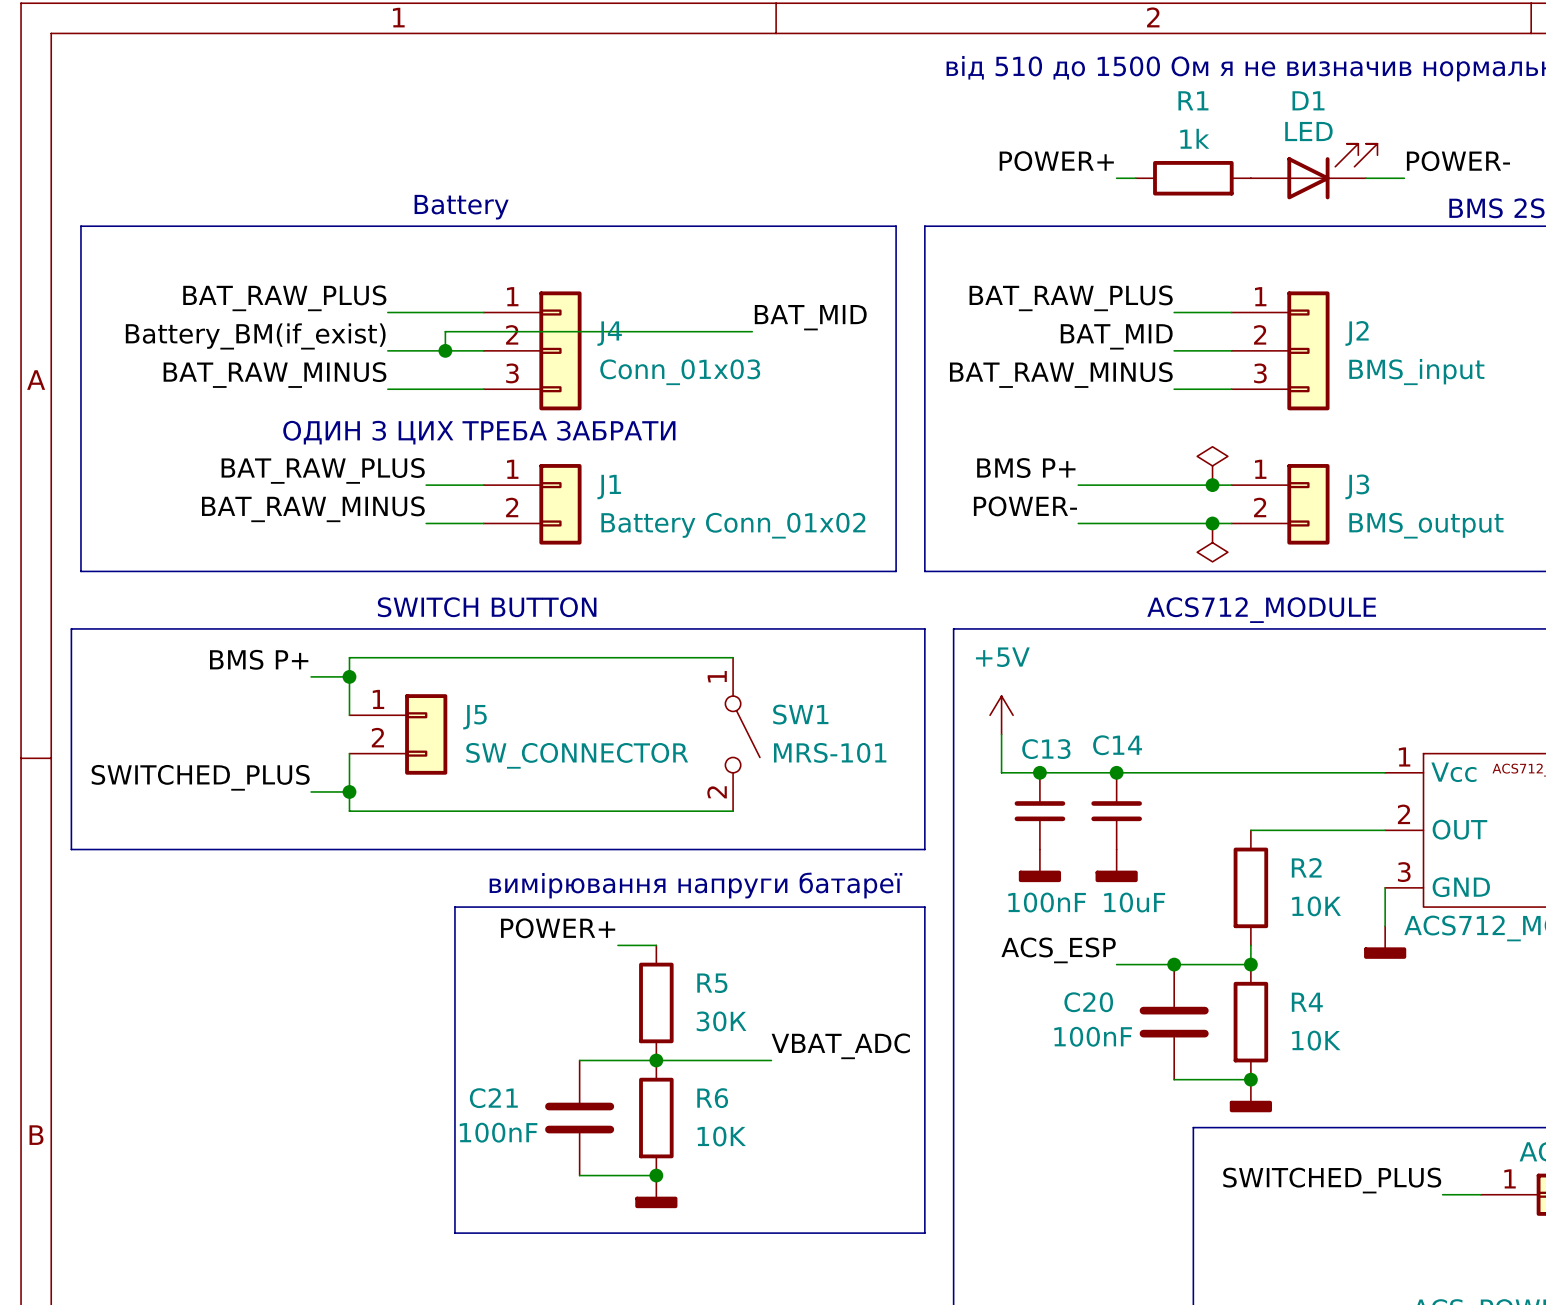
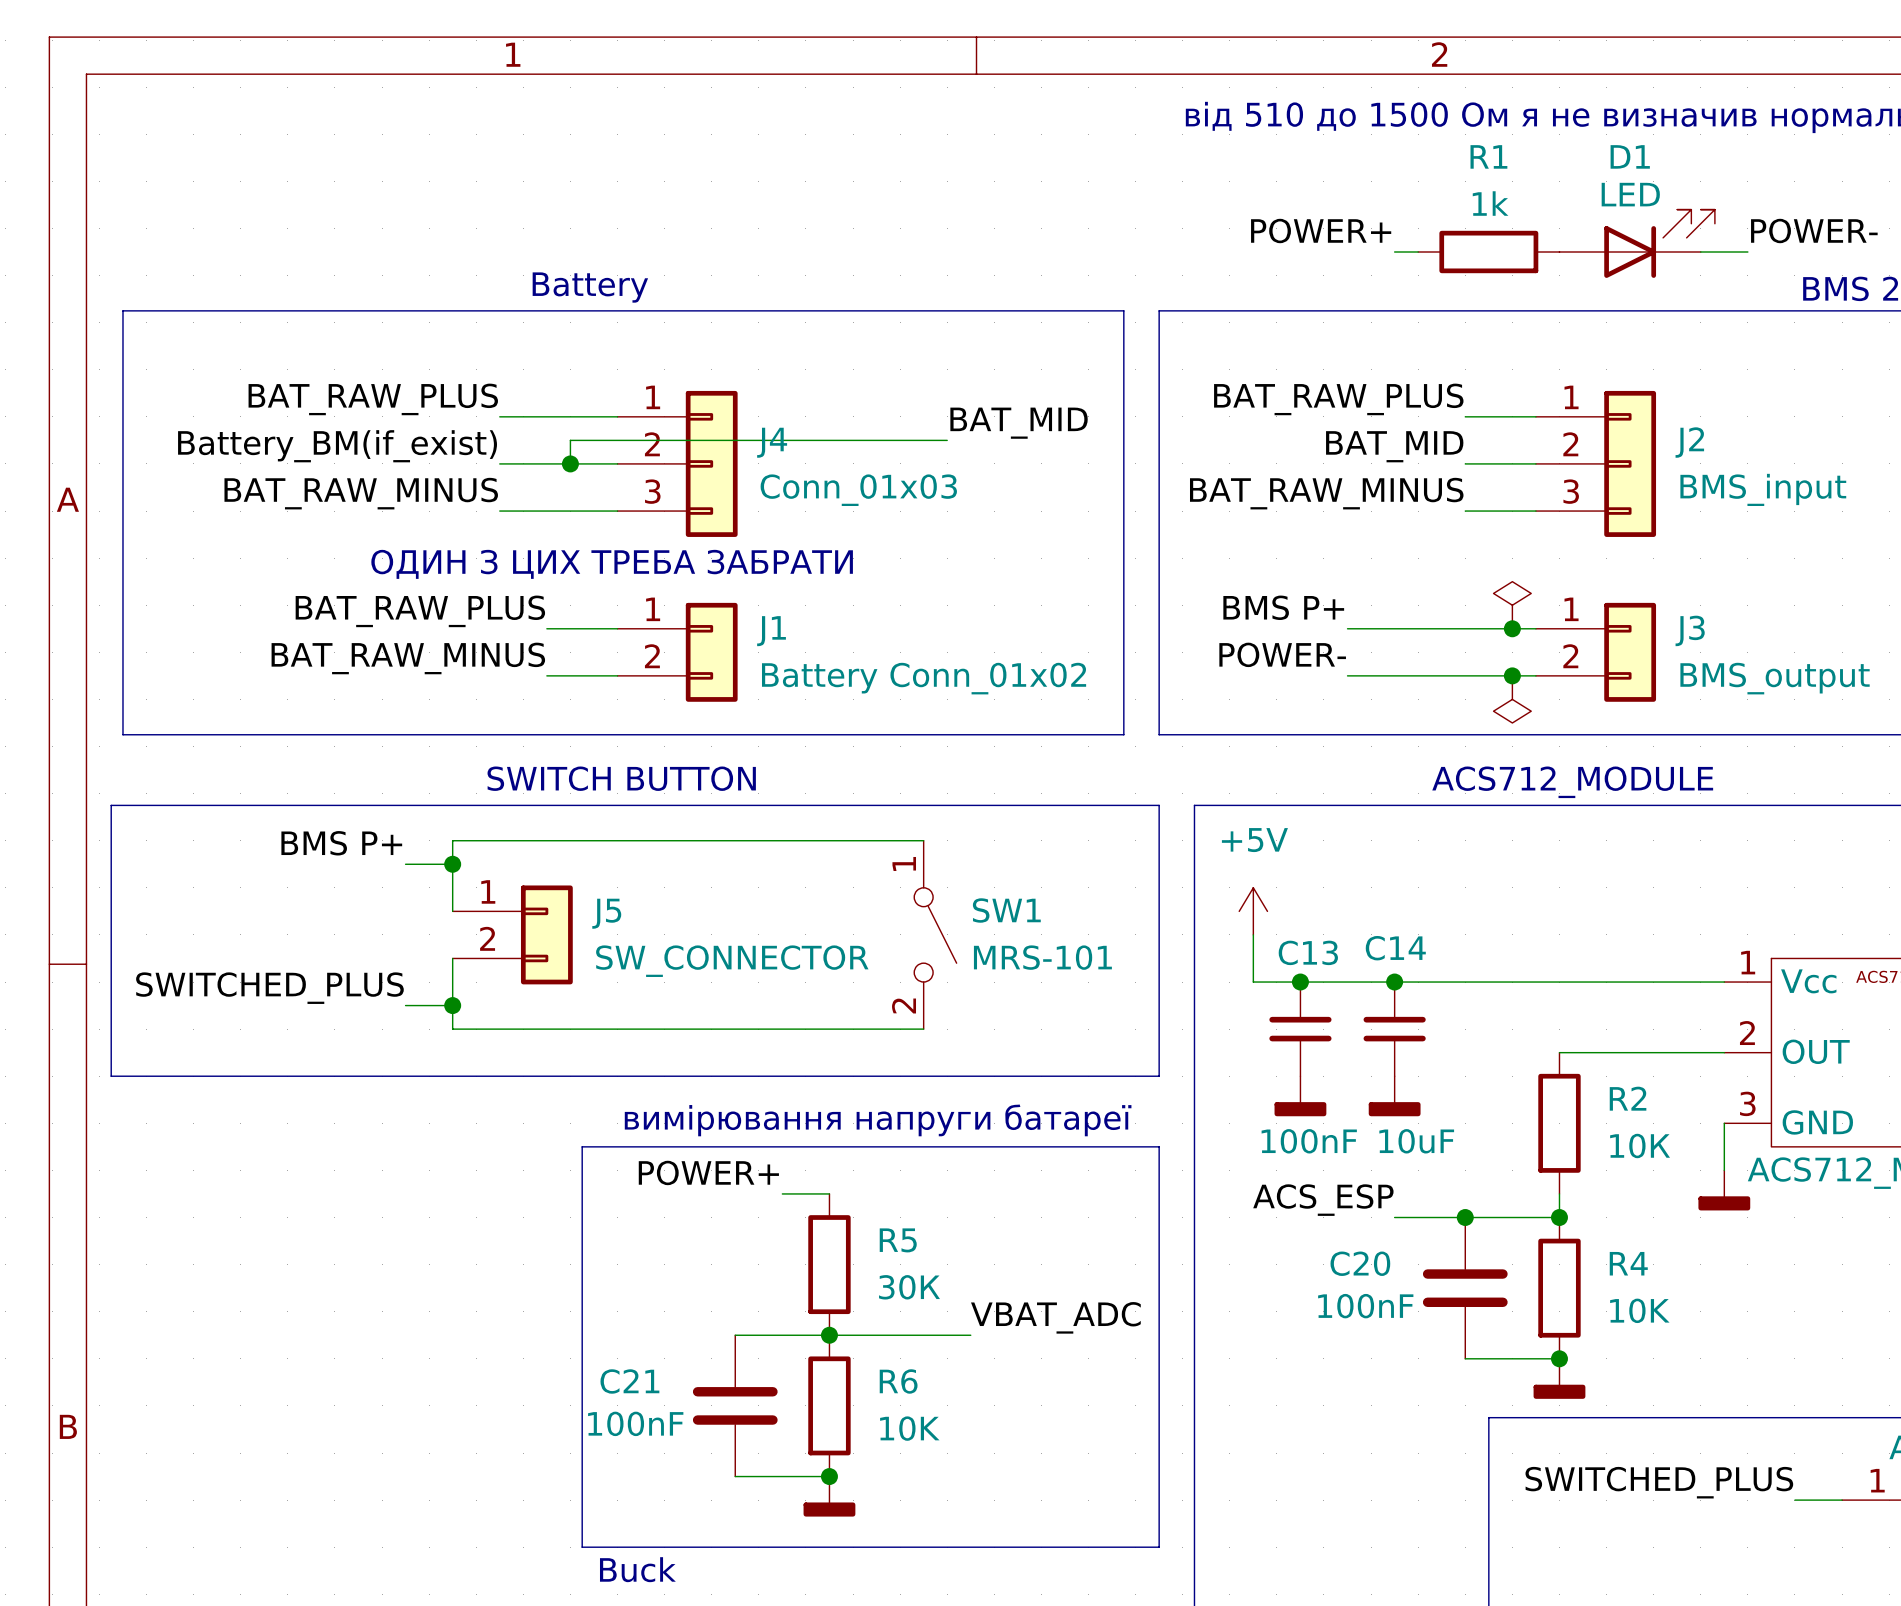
text: none -> Buck (637, 1569)

